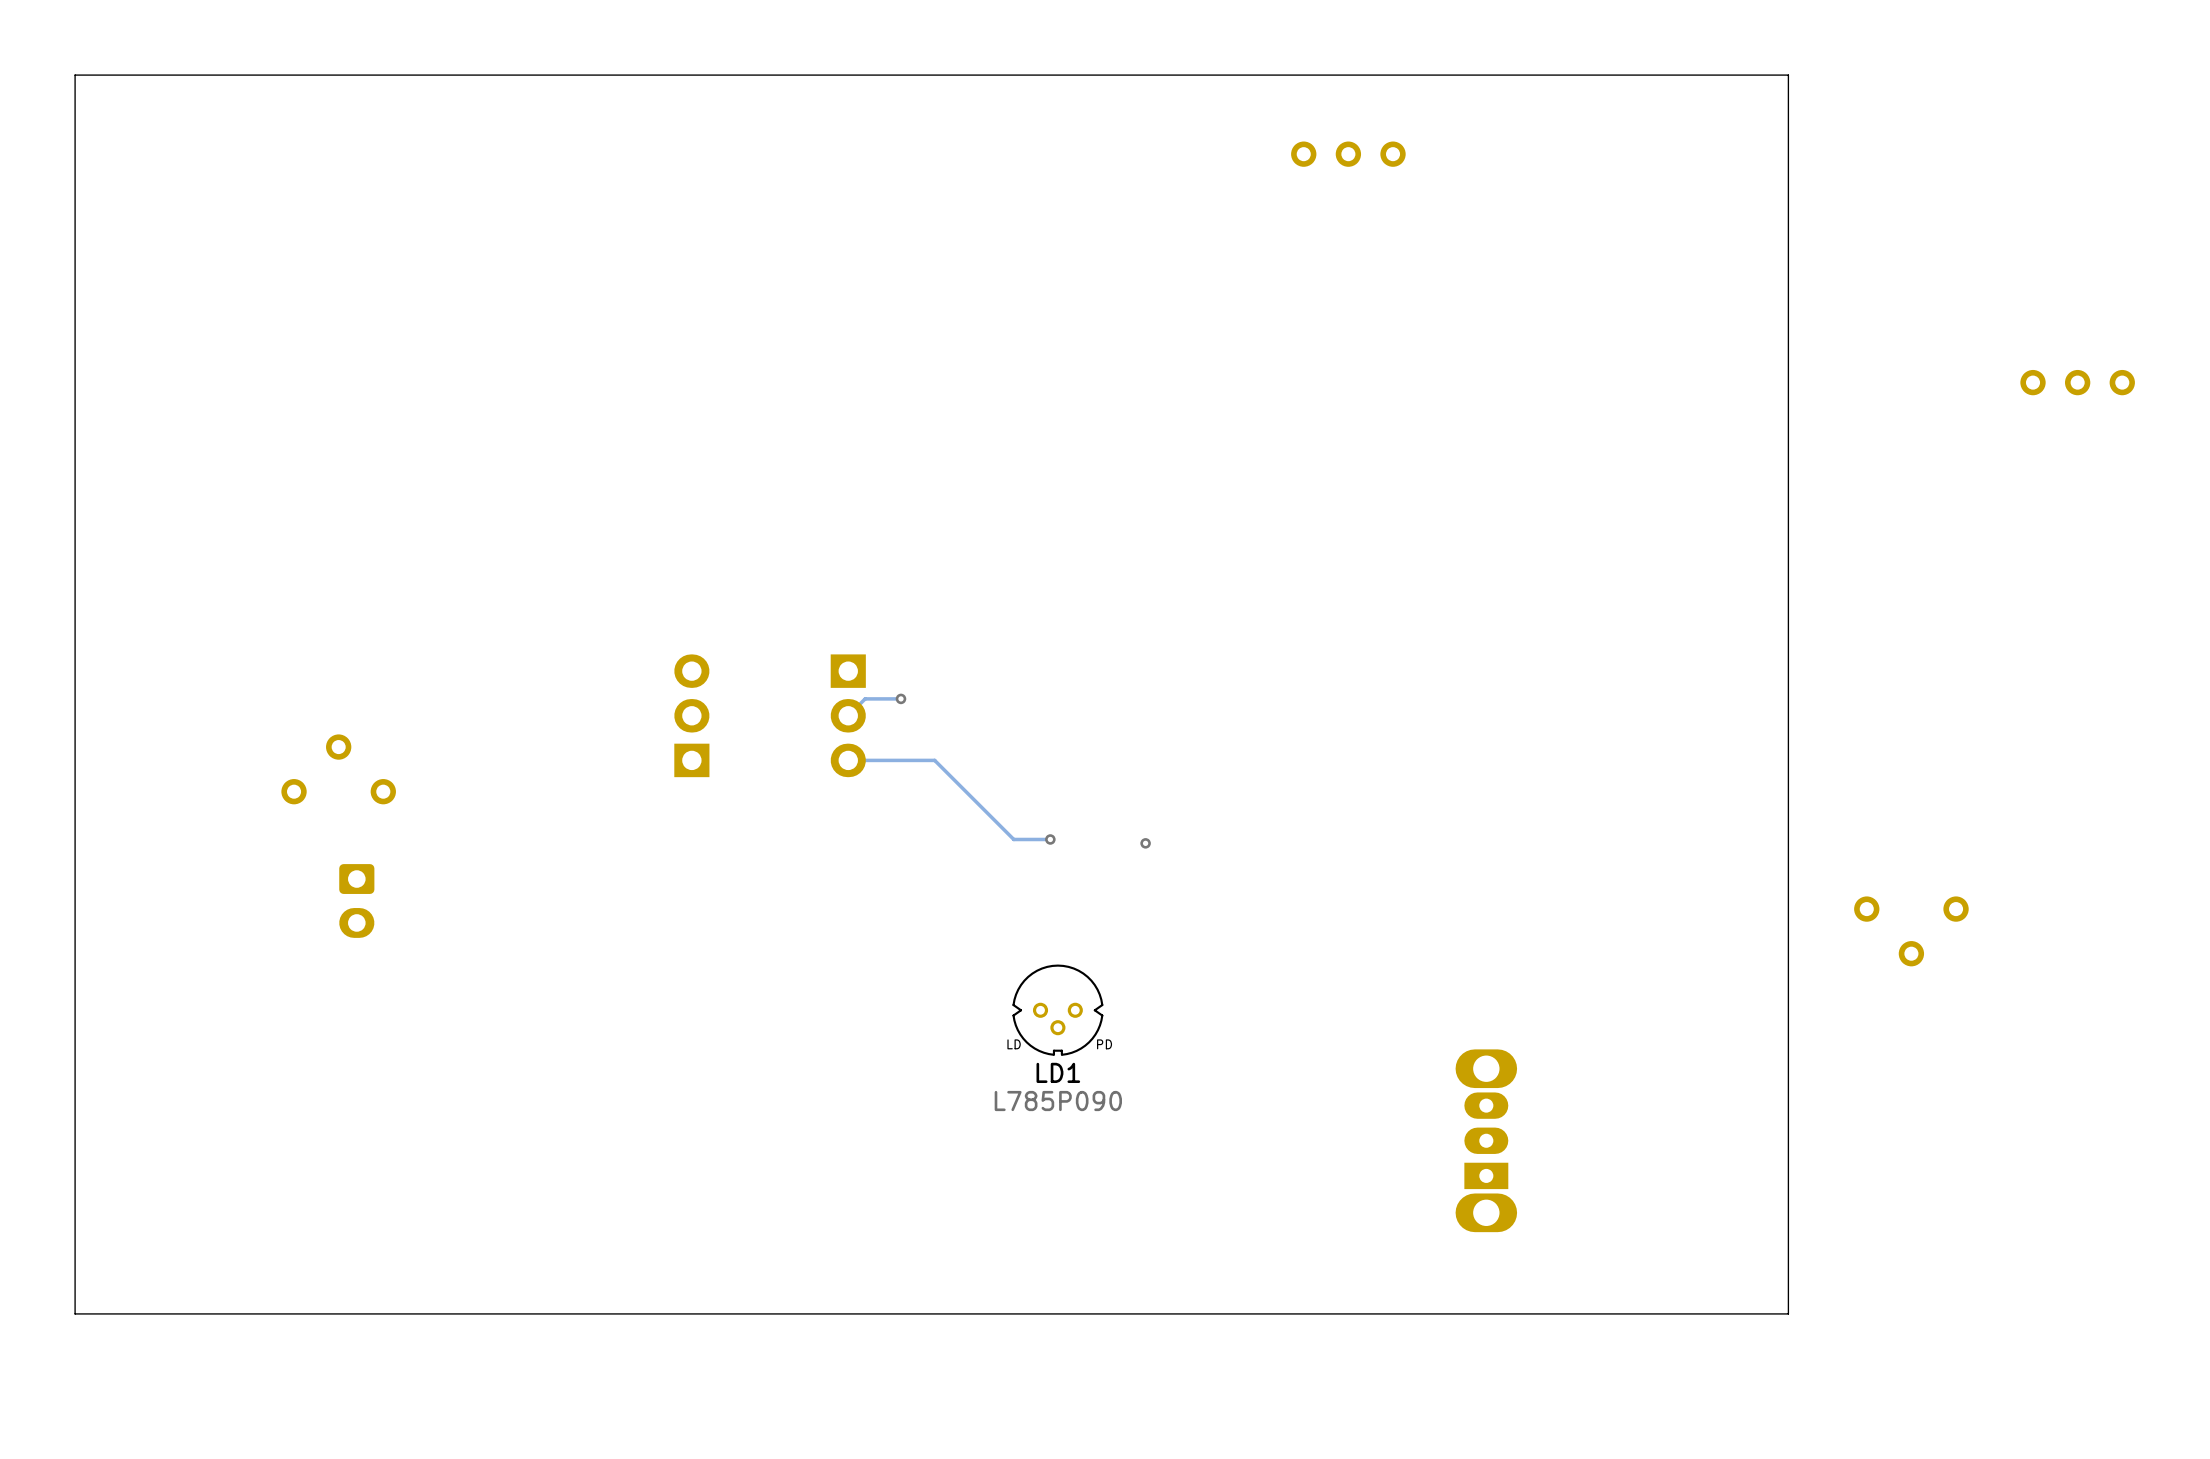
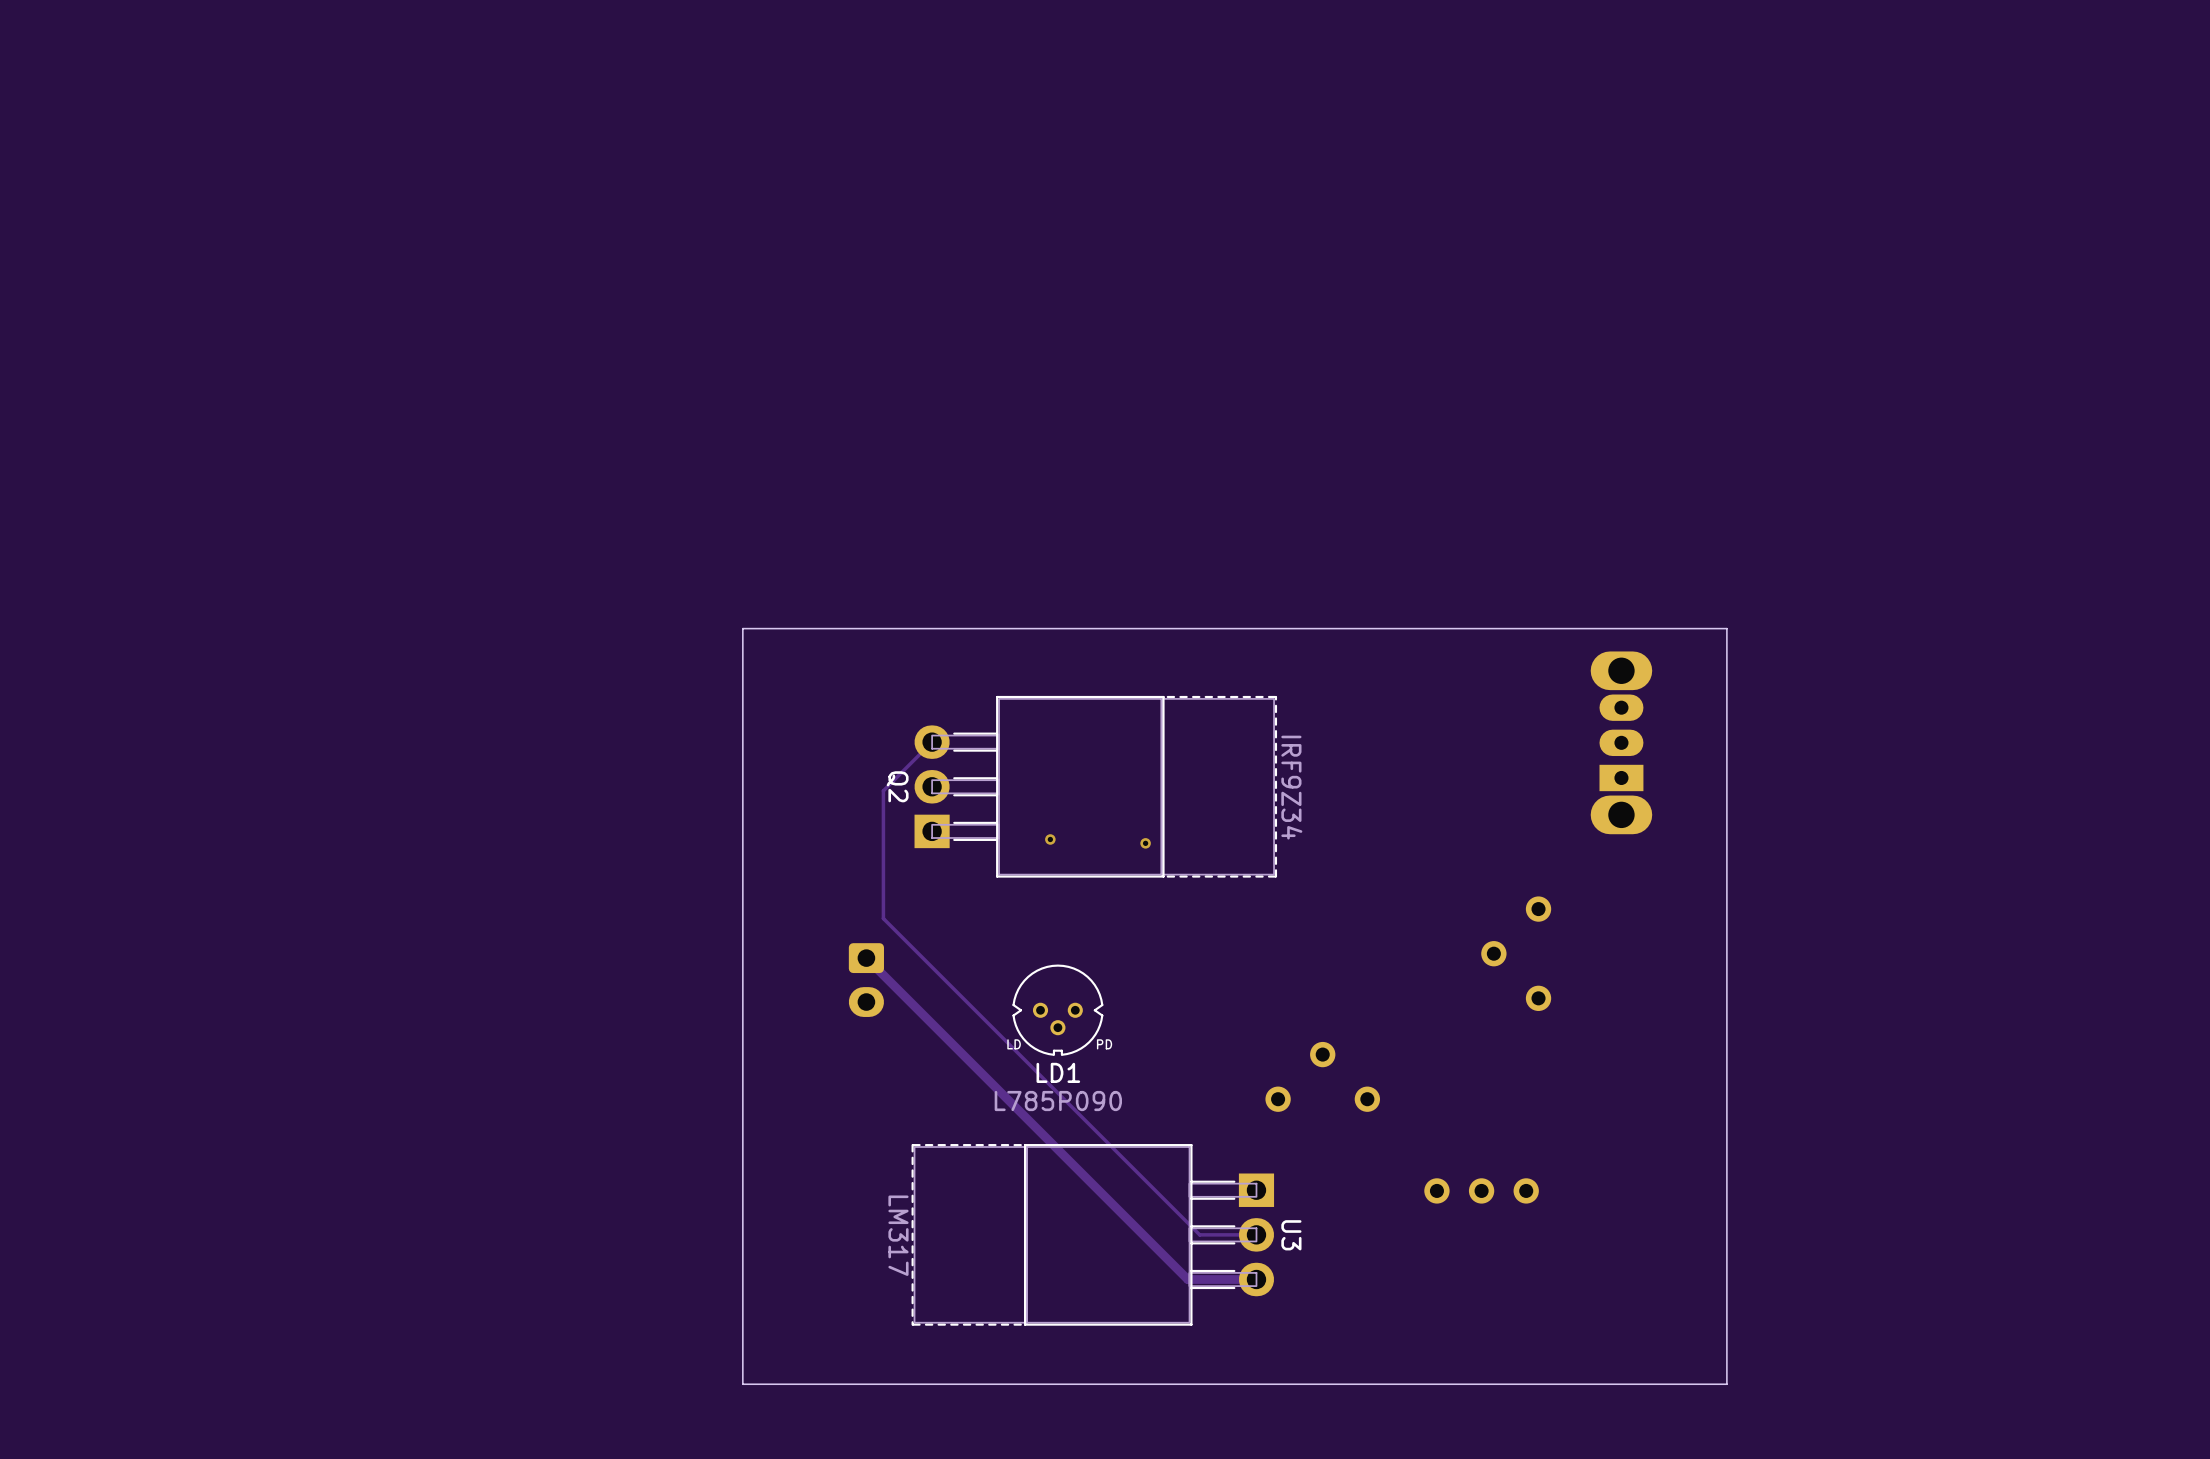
board edge: (1788, 75) (75, 75) (75, 1313) (1788, 1313) (1788, 75) -> none
part: (1348, 154) -> none
part: (2077, 382) -> none
board edge: none -> (1726, 628) (742, 628) (742, 1384) (1726, 1384) (1726, 628)
track: (900, 698) (865, 698) (848, 715) -> none
via: (900, 698) -> none
part: (691, 715) -> none
Q2 side: top (848, 715) -> bottom (1095, 786)
track: none -> (932, 742) (883, 790) (883, 918) (1199, 1234) (1256, 1234)
track: (848, 760) (934, 760) (1013, 839) (1050, 839) -> none
part: (338, 769) -> none
part: (356, 900) -> none
part: (1911, 931) -> none
part: none -> (1516, 953)
track: none -> (866, 958) (1187, 1279) (1256, 1279)
part: none -> (866, 980)
part: none -> (1322, 1076)
part position: (1486, 1140) -> (1621, 742)
part: none -> (1481, 1190)
U3: none -> LM317 (1092, 1234)

